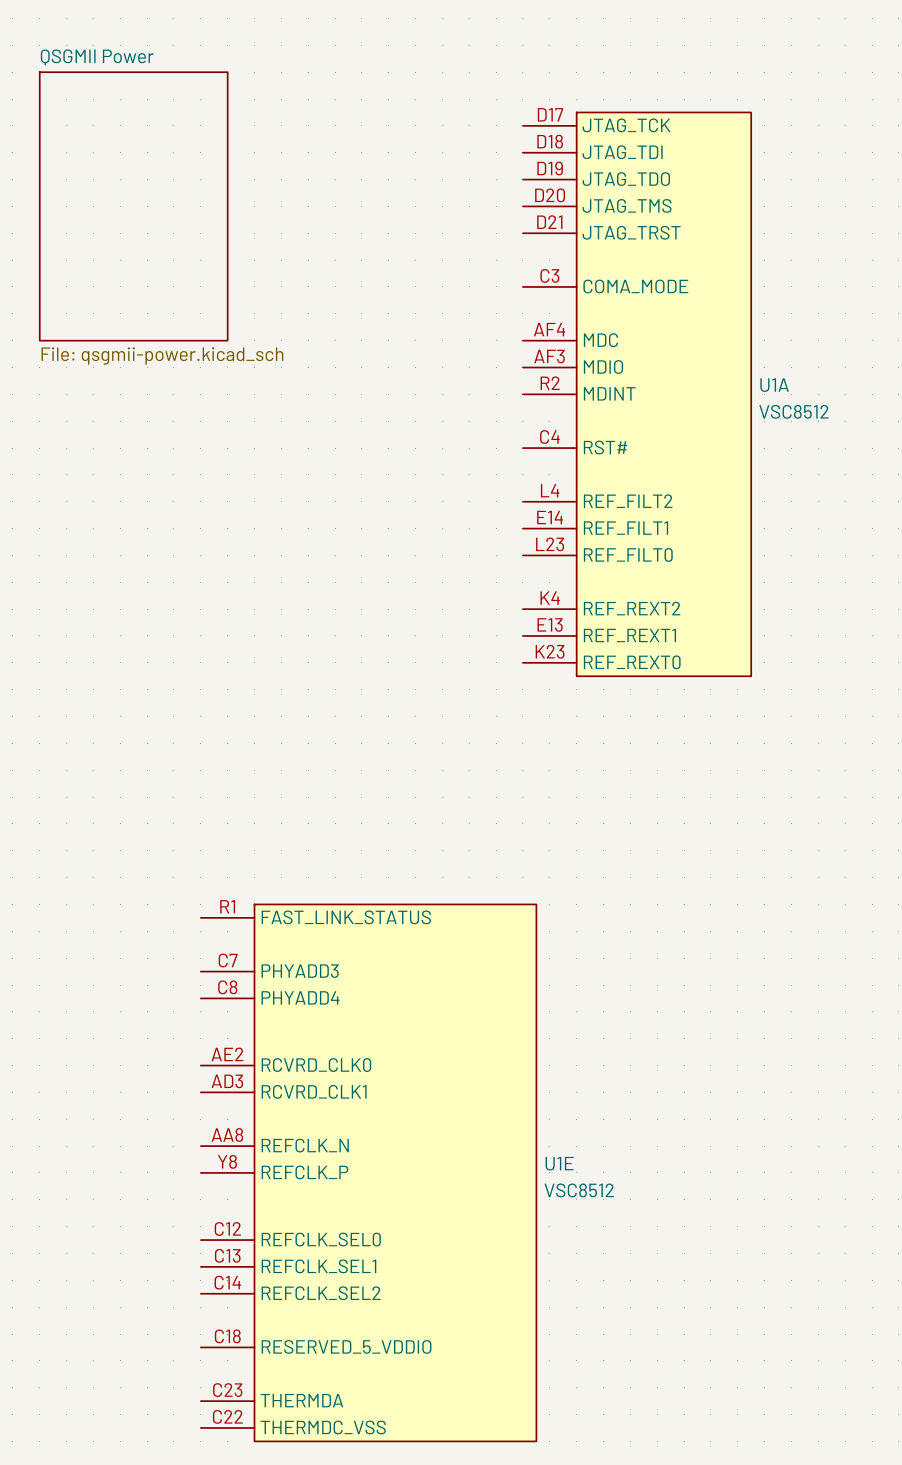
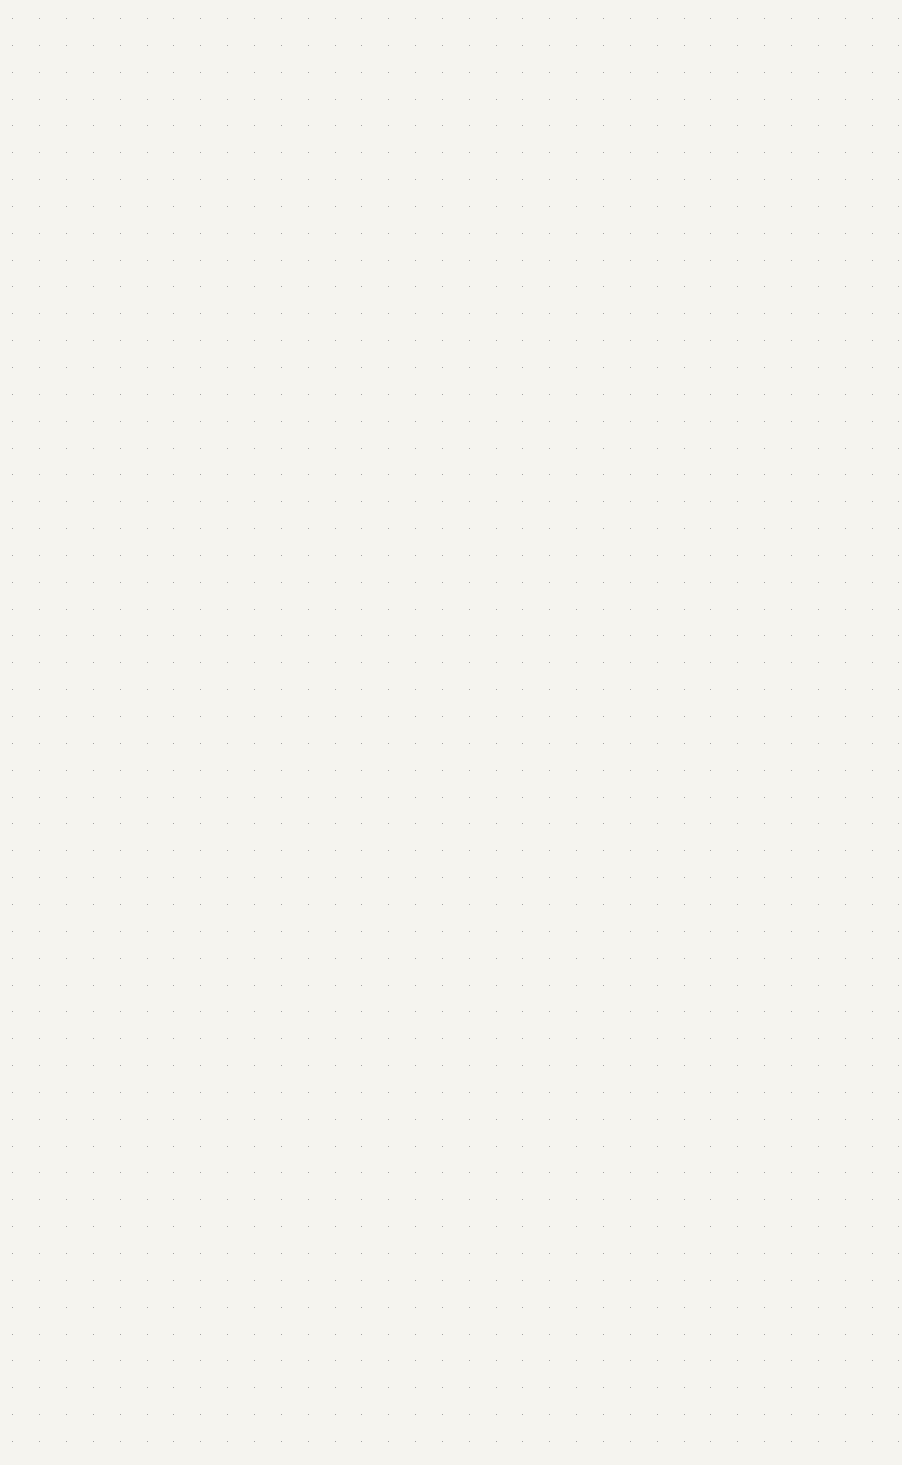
sheet QSGMII Power: File: qsgmii-power.kicad_sch (133, 206) -> none
U1A: VSC8512 (637, 394) -> none
U1E: VSC8512 (369, 1172) -> none

